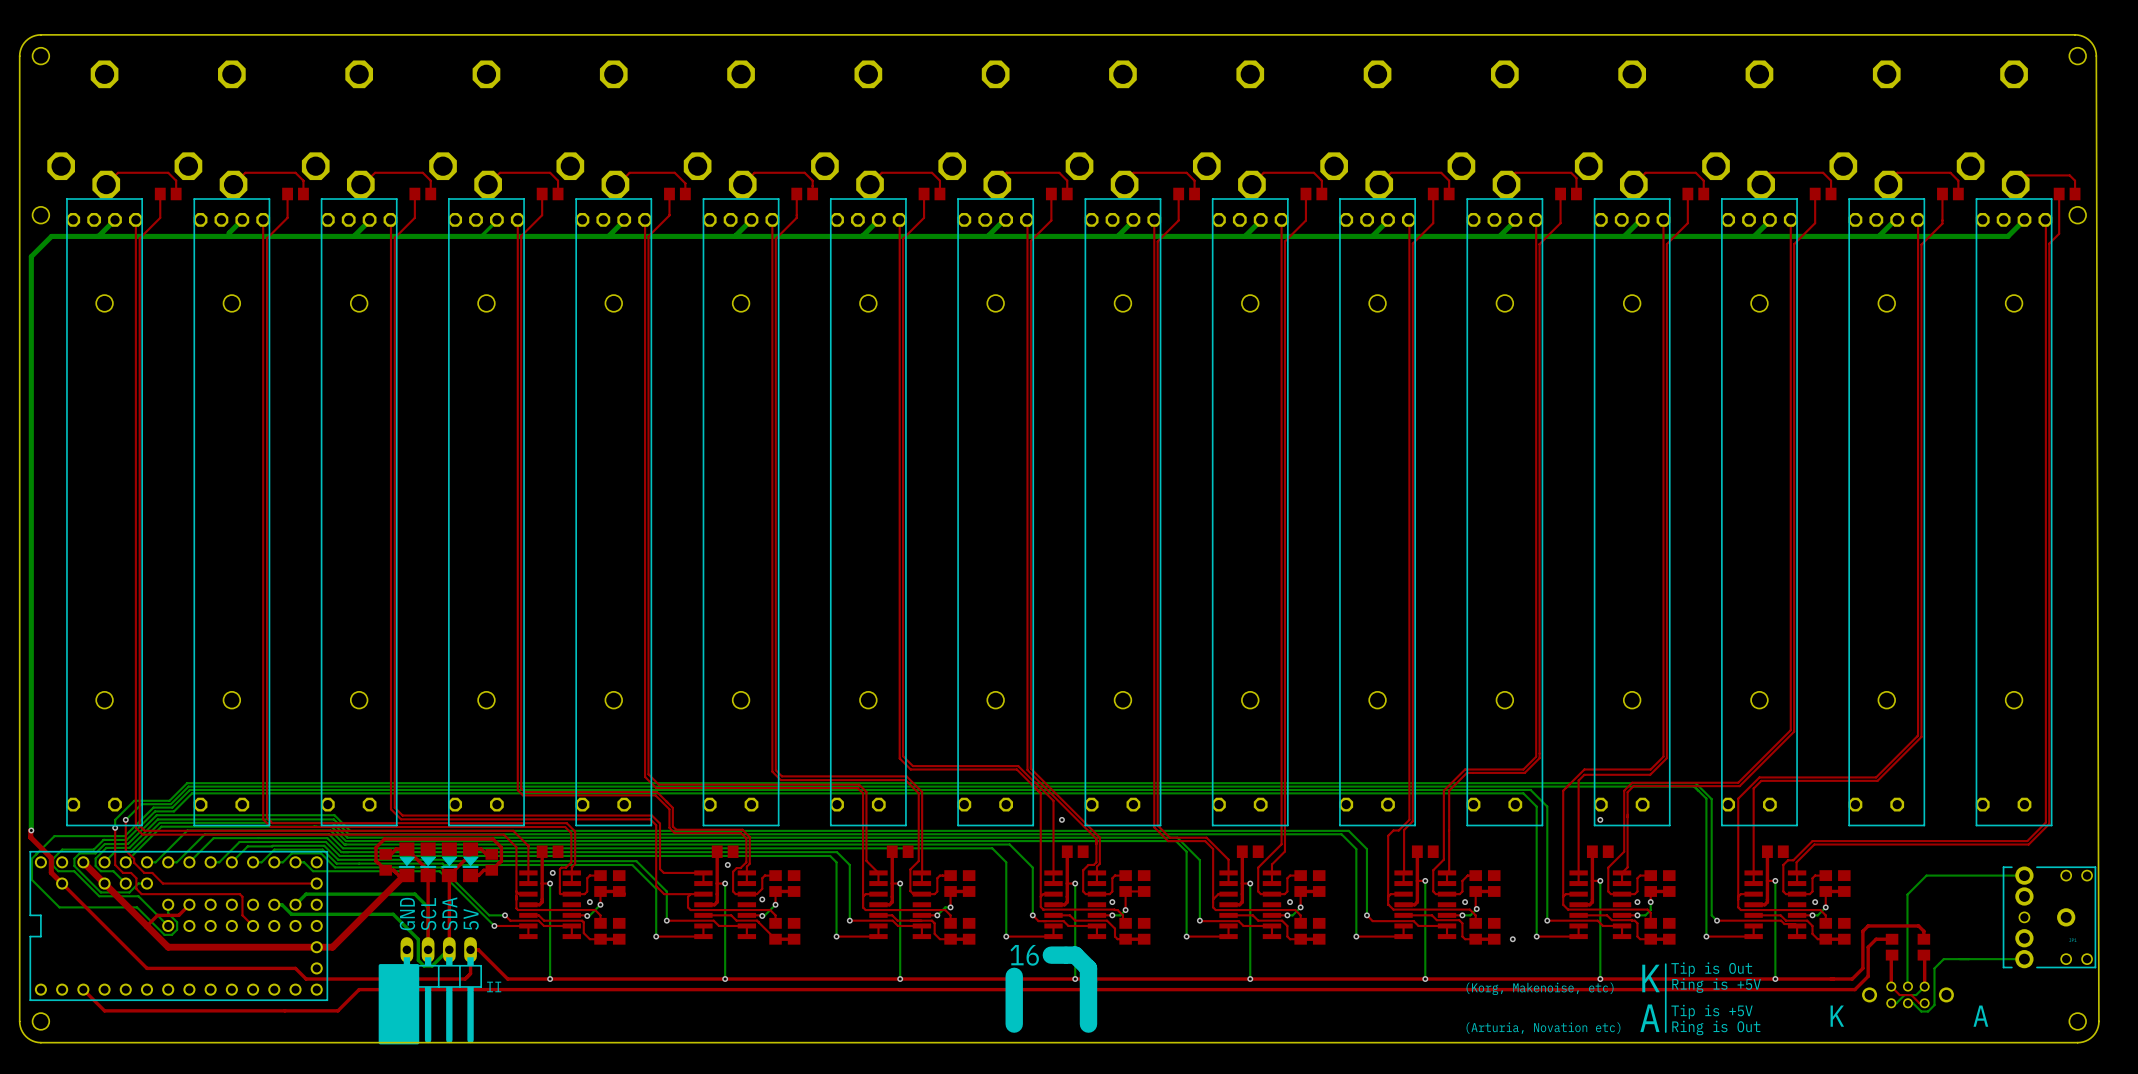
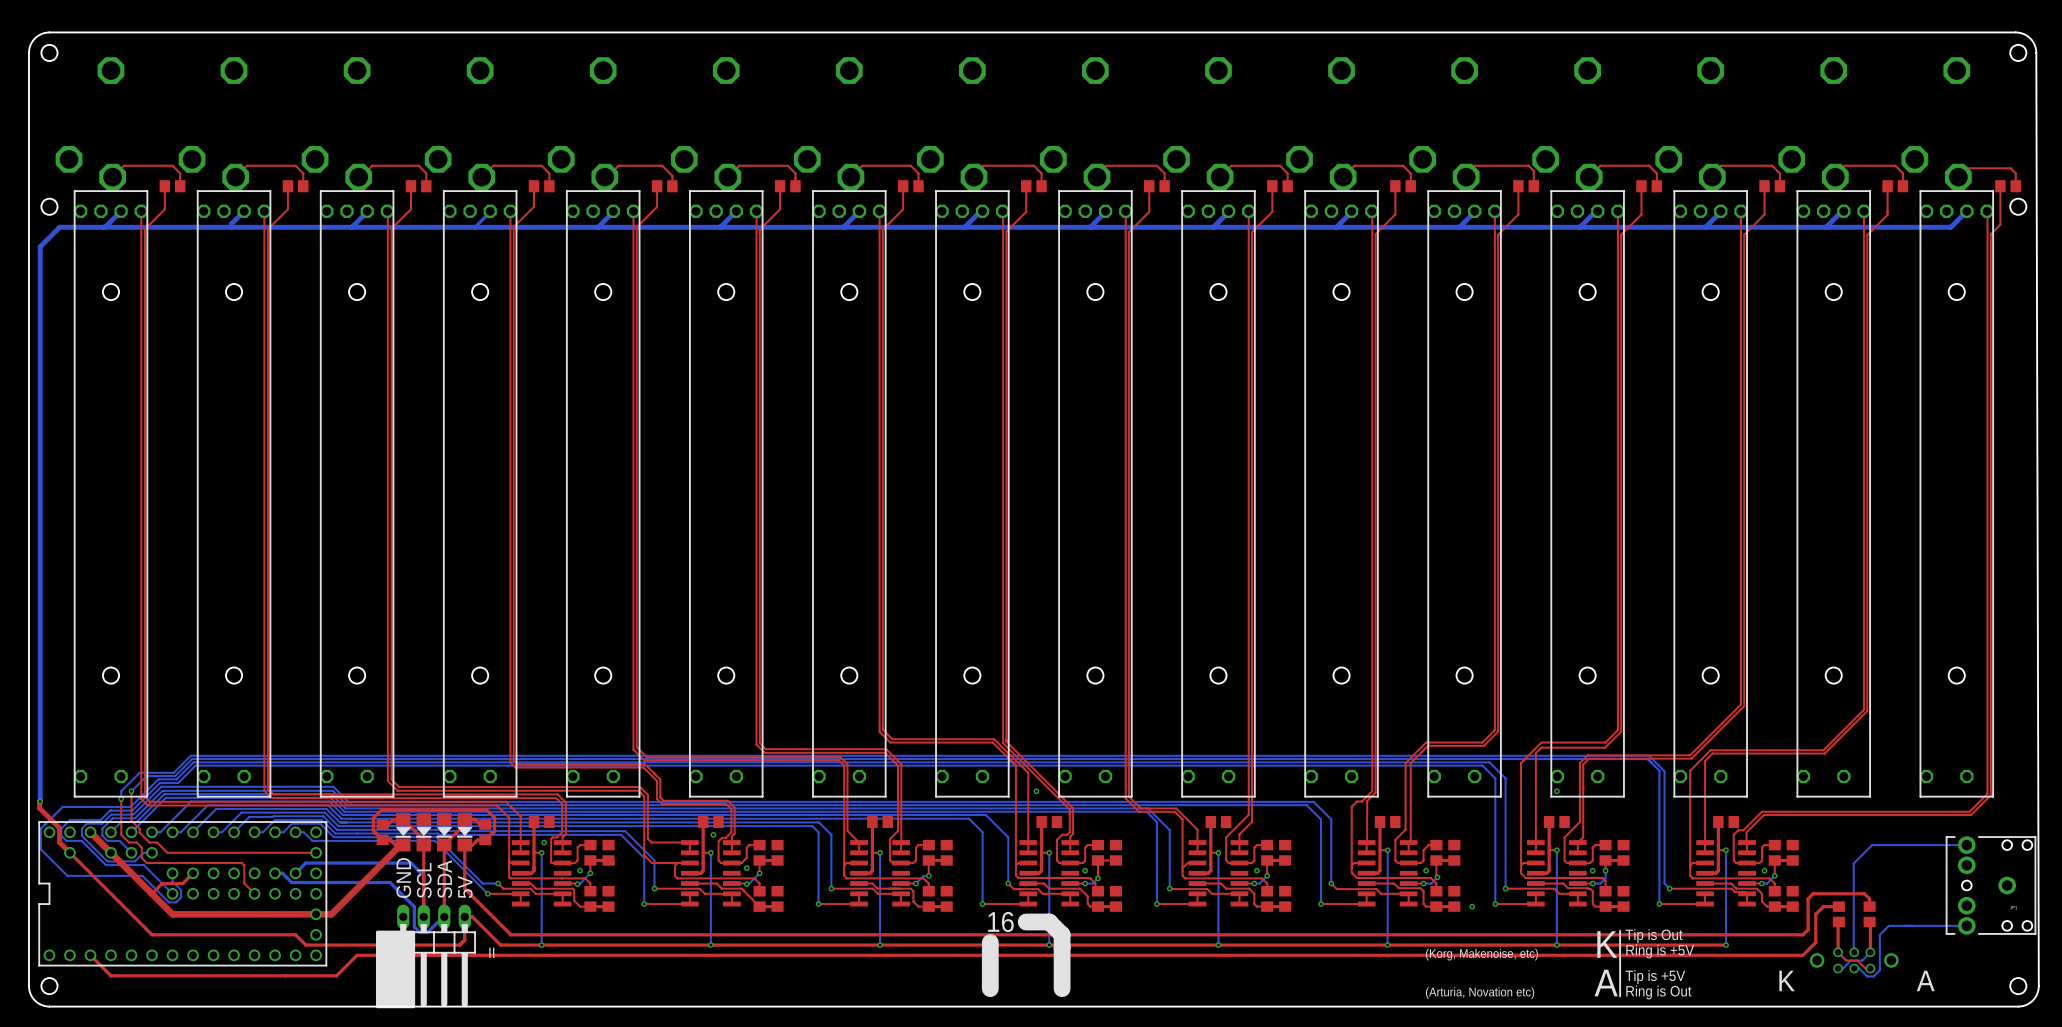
top track: (1868, 925) (1862, 931) (1862, 968) (1852, 979) (1775, 979) -> (1815, 893) (1808, 898) (1808, 929) (1802, 934) (510, 934) (464, 888) (464, 844)

